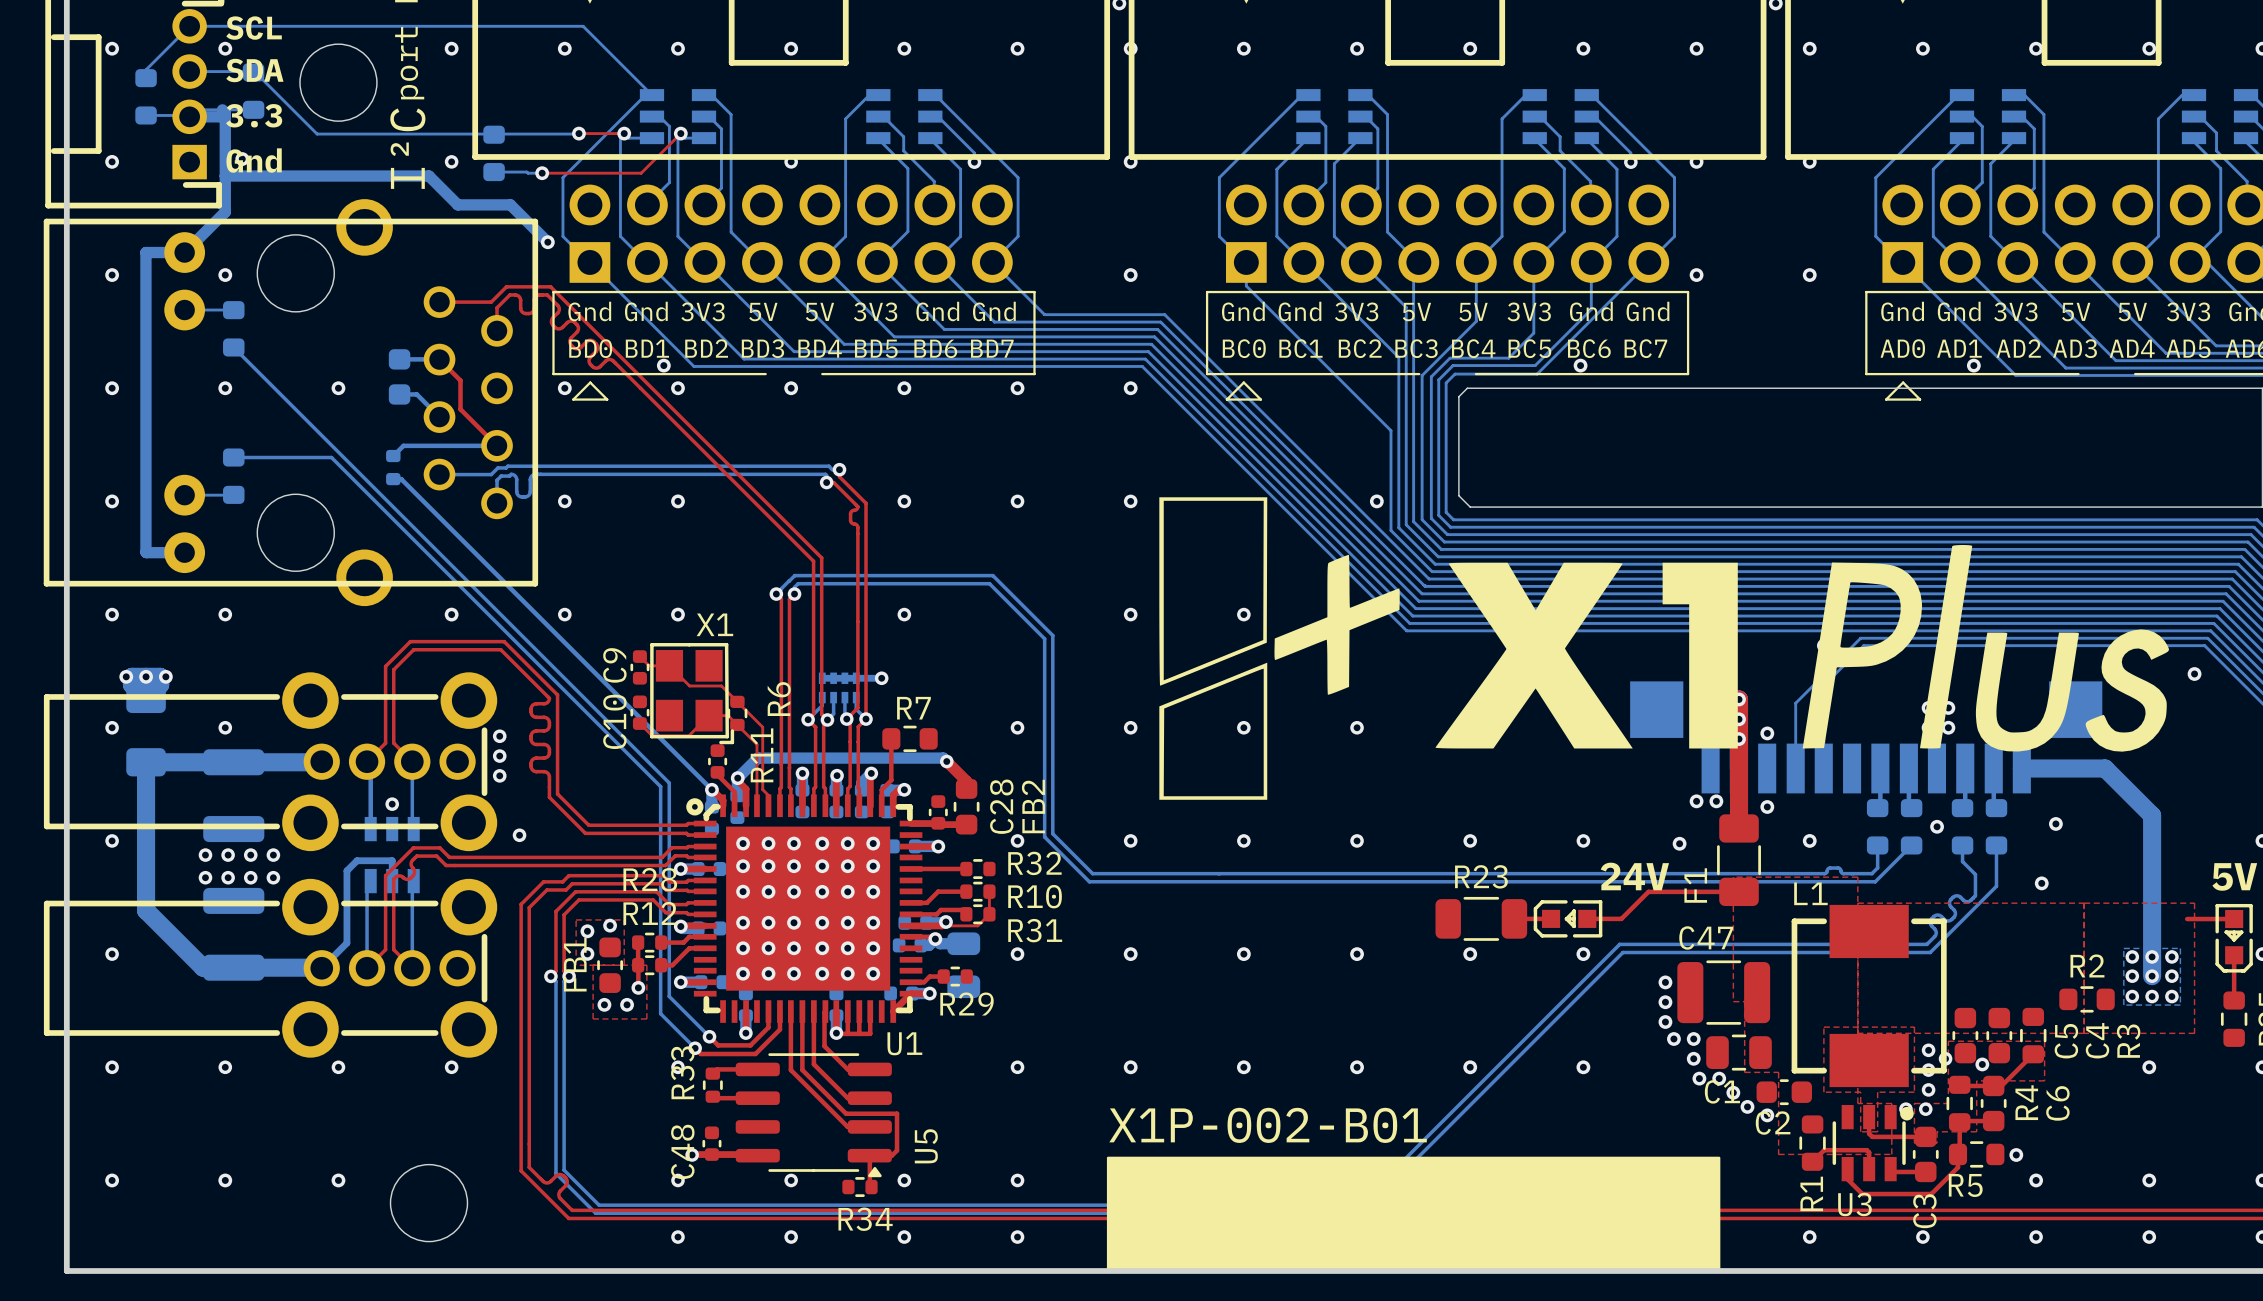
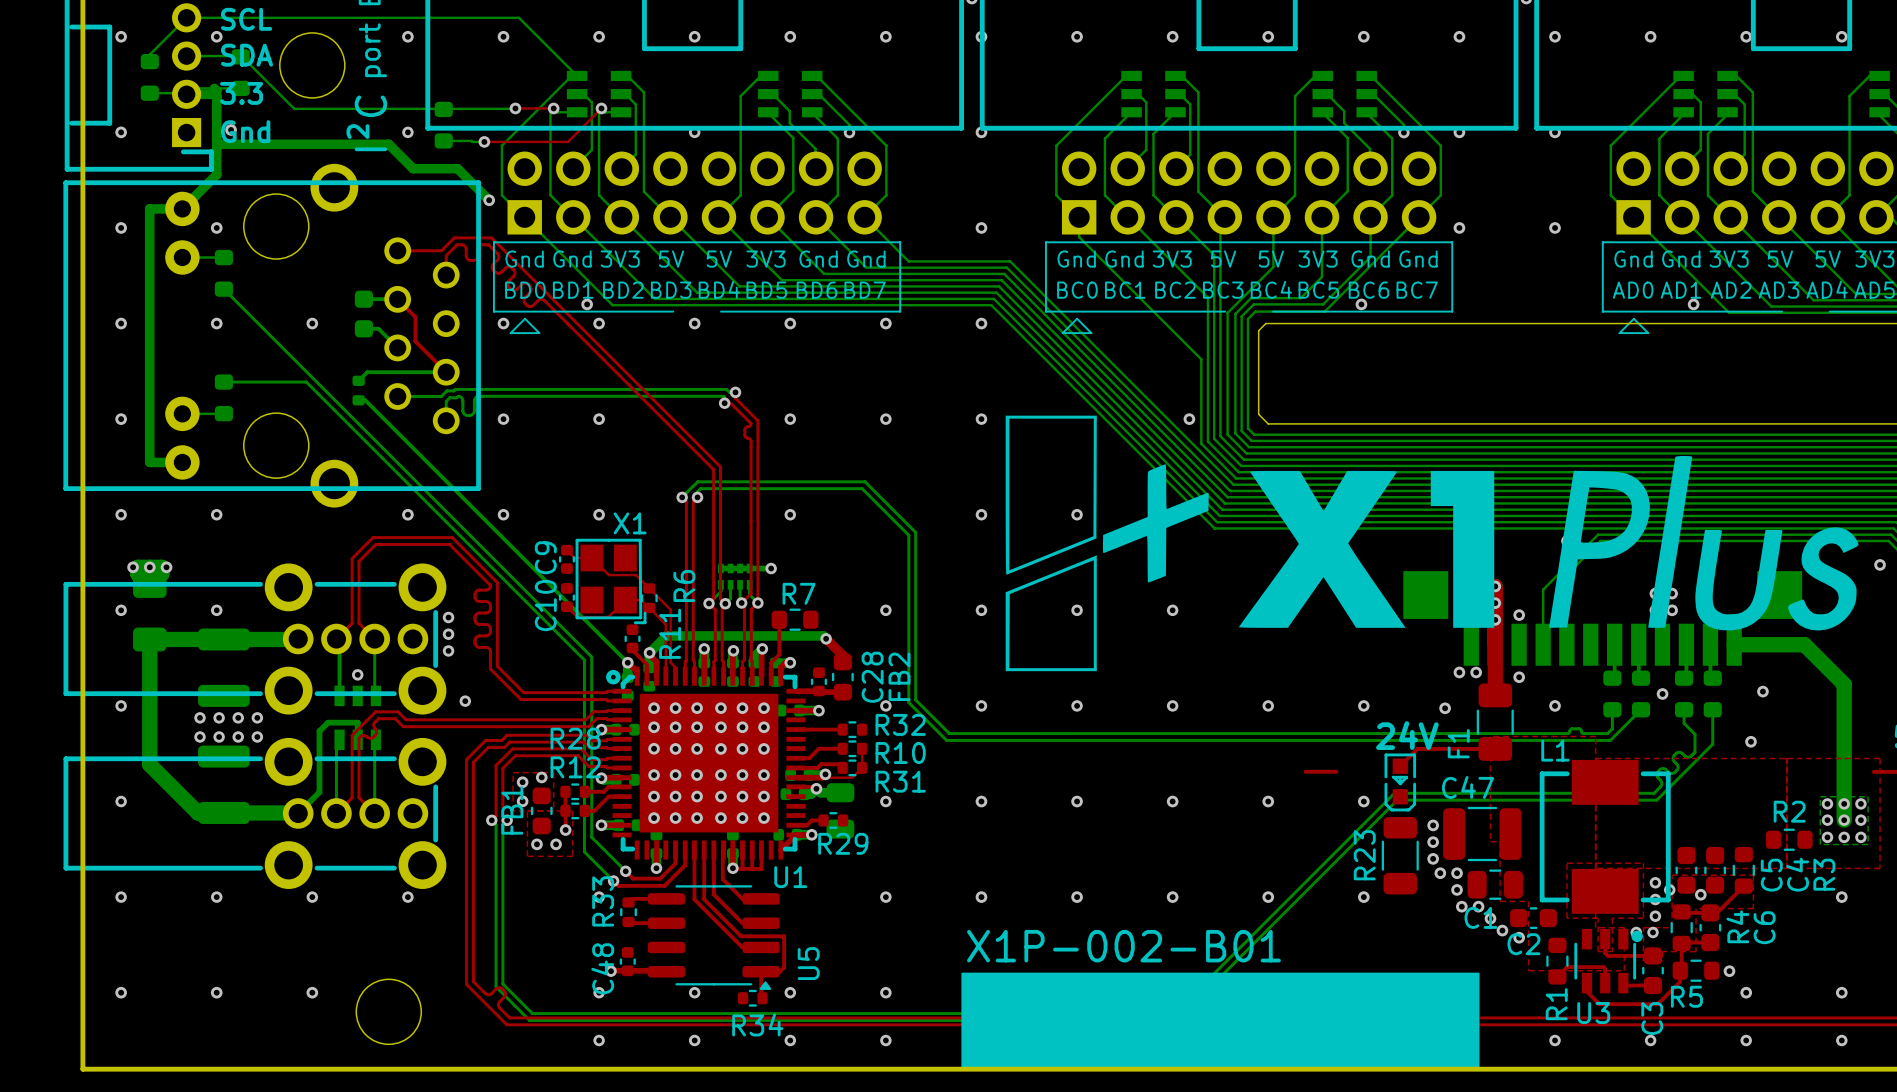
R23 name position: R23 (1481, 876) -> R23 (1364, 855)
top track: (1648, 891) (1621, 918) (1587, 918) -> (1418, 748) (1400, 766)
R23 rotation: 0° (1481, 918) -> 90° clockwise (1400, 855)
R23 position: (1481, 918) -> (1400, 855)
part rotation: 0° (1568, 918) -> 90° counterclockwise (1400, 782)
part position: (1568, 918) -> (1400, 782)

